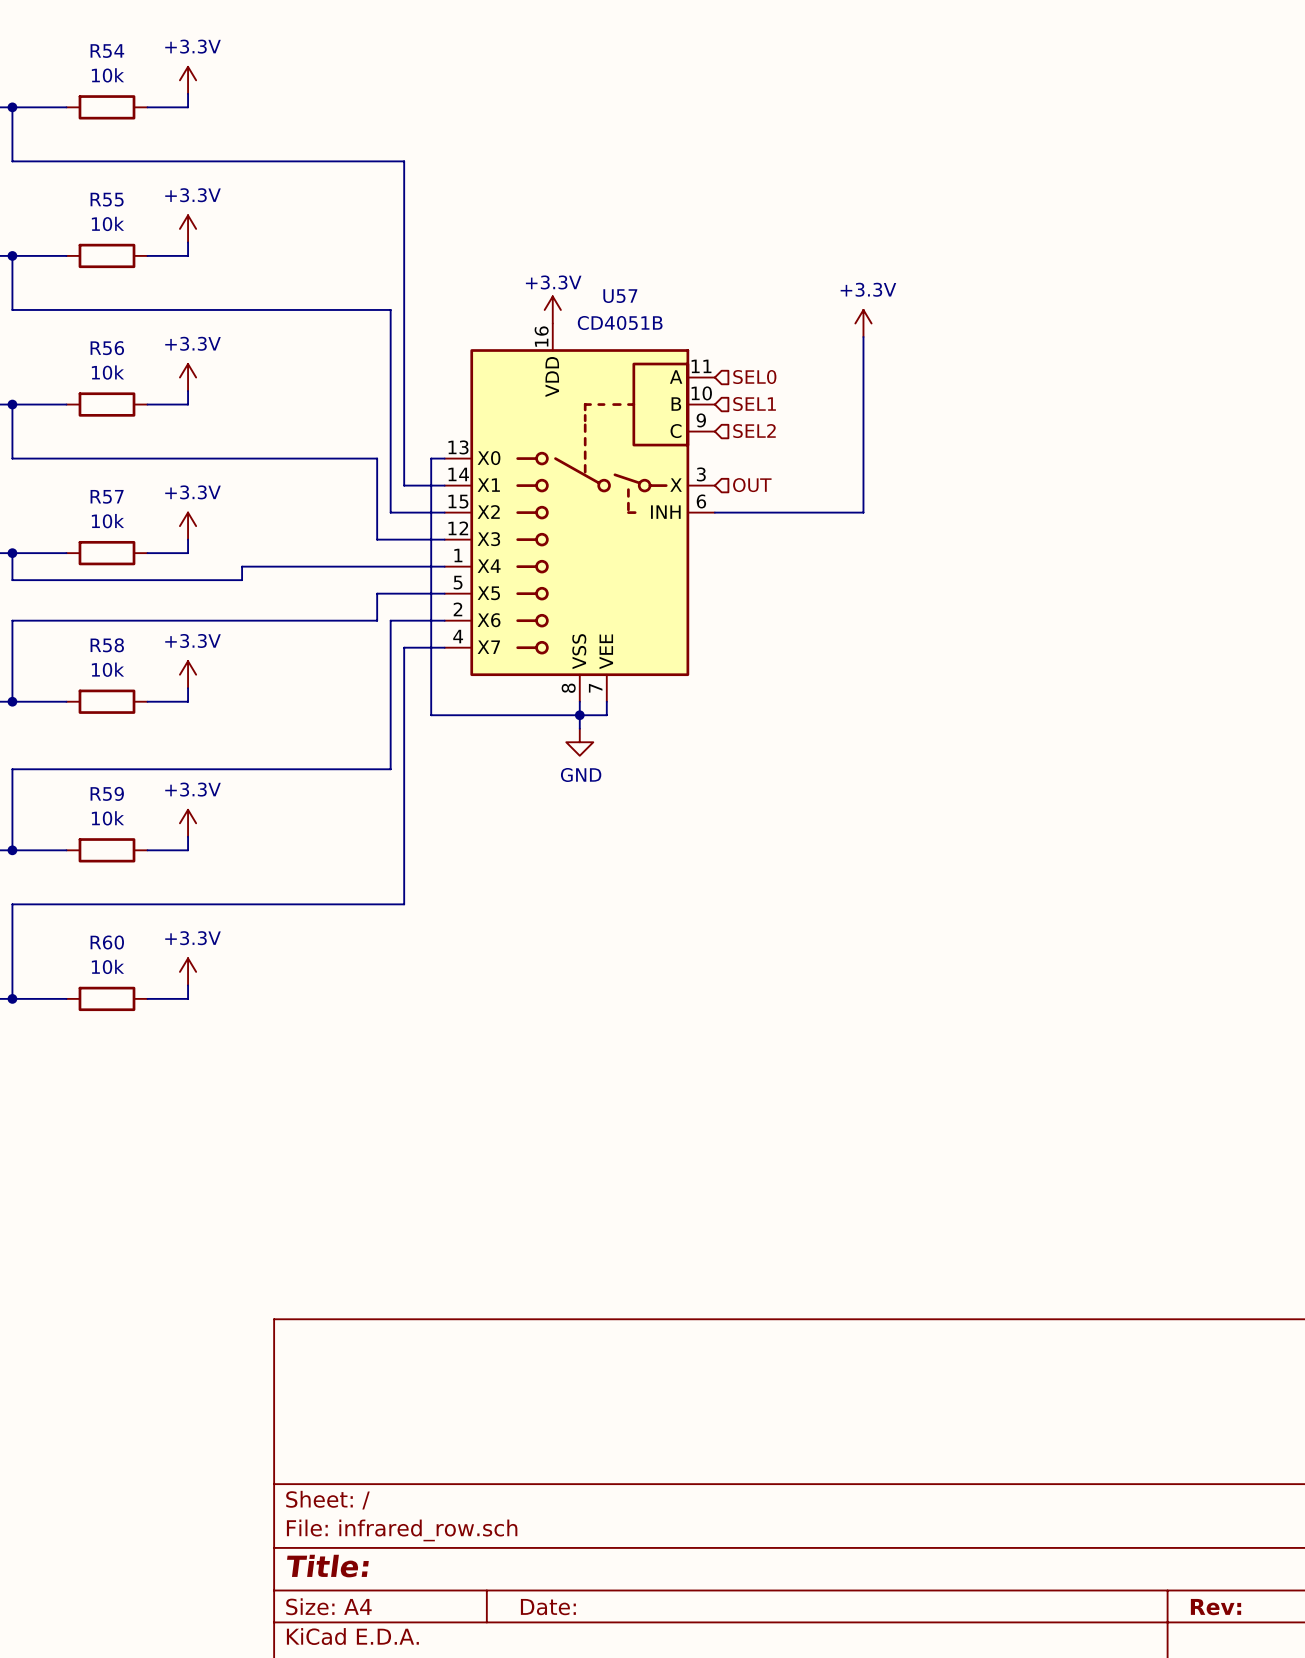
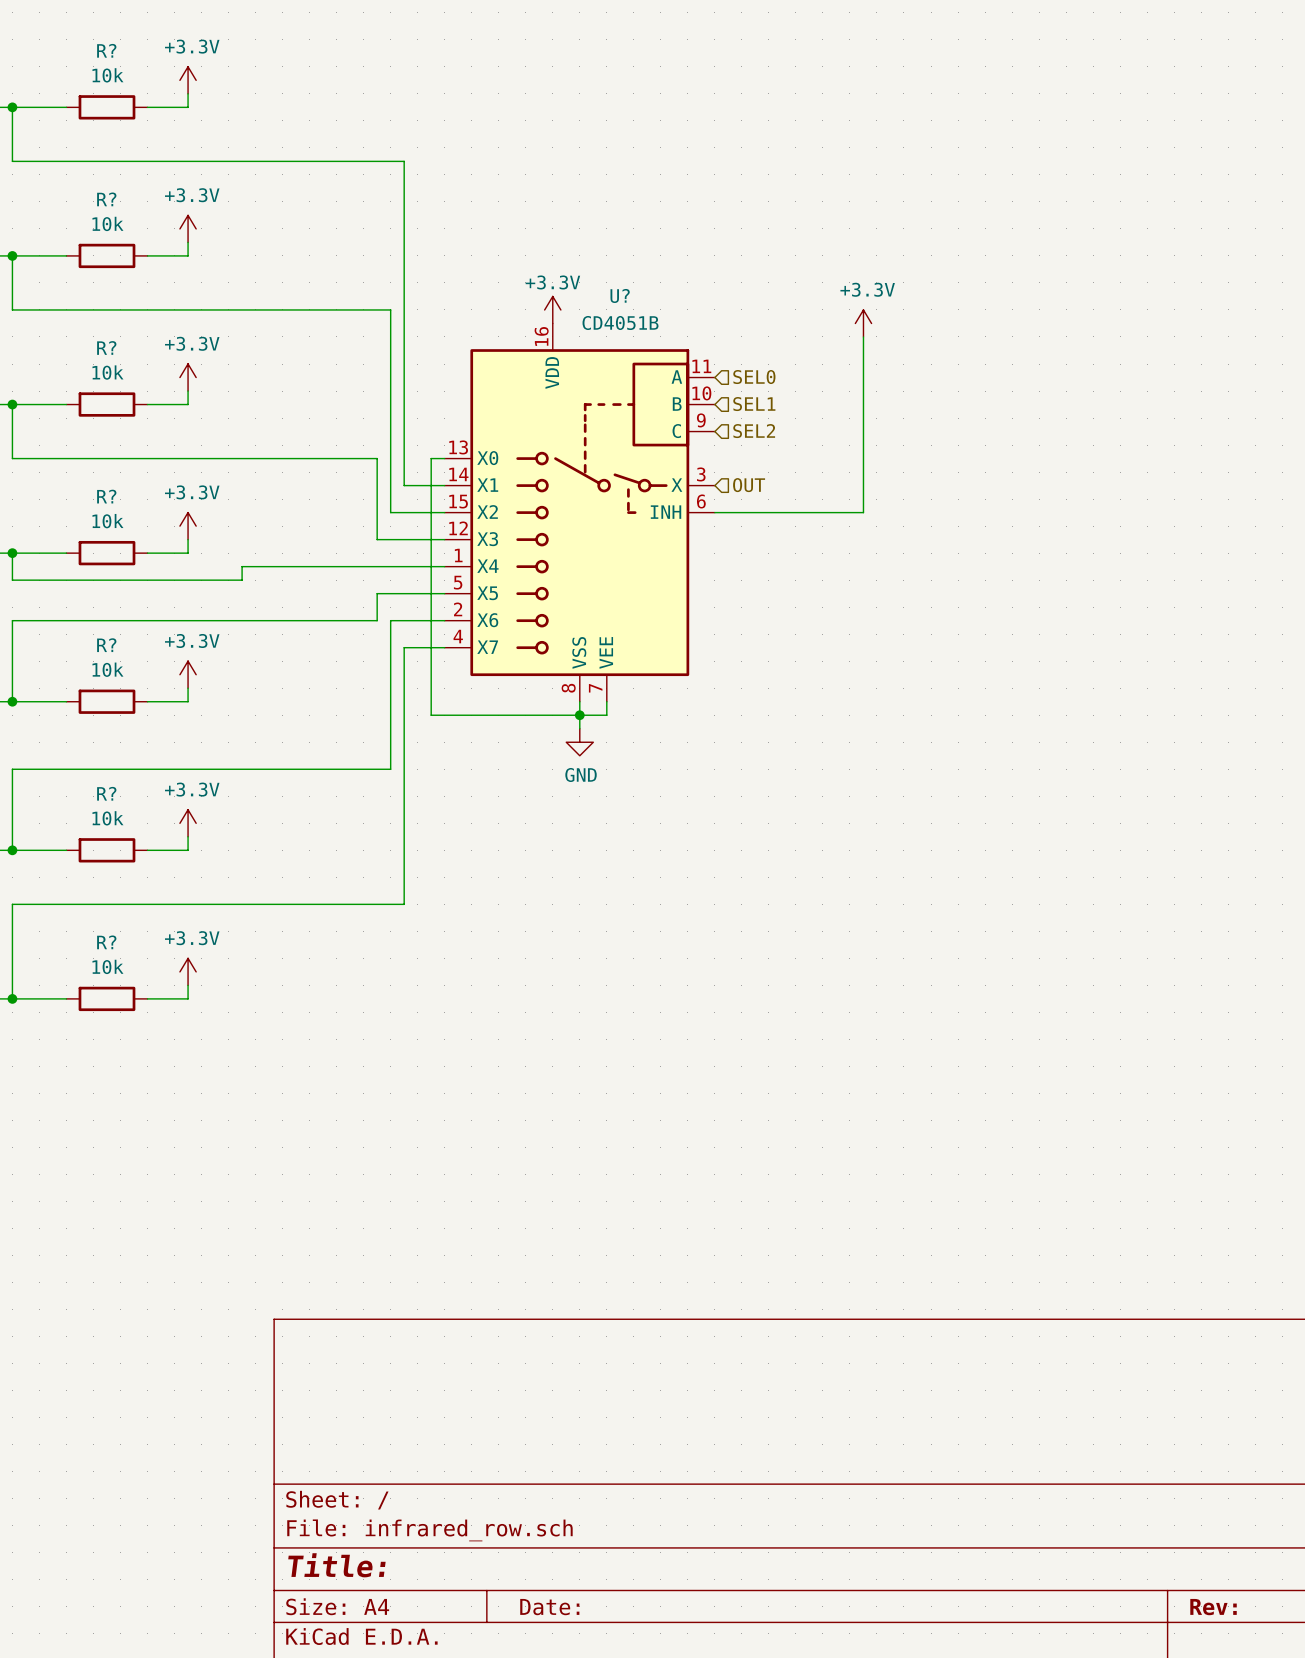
R54 name: R54 (107, 51) -> R? (106, 50)
R55 name: R55 (107, 199) -> R? (106, 199)
U57 name: U57 (620, 296) -> U? (620, 295)
R56 name: R56 (107, 348) -> R? (106, 347)
R57 name: R57 (107, 496) -> R? (106, 496)
R58 name: R58 (107, 645) -> R? (106, 645)
R59 name: R59 (107, 793) -> R? (106, 793)
R60 name: R60 (107, 942) -> R? (106, 942)

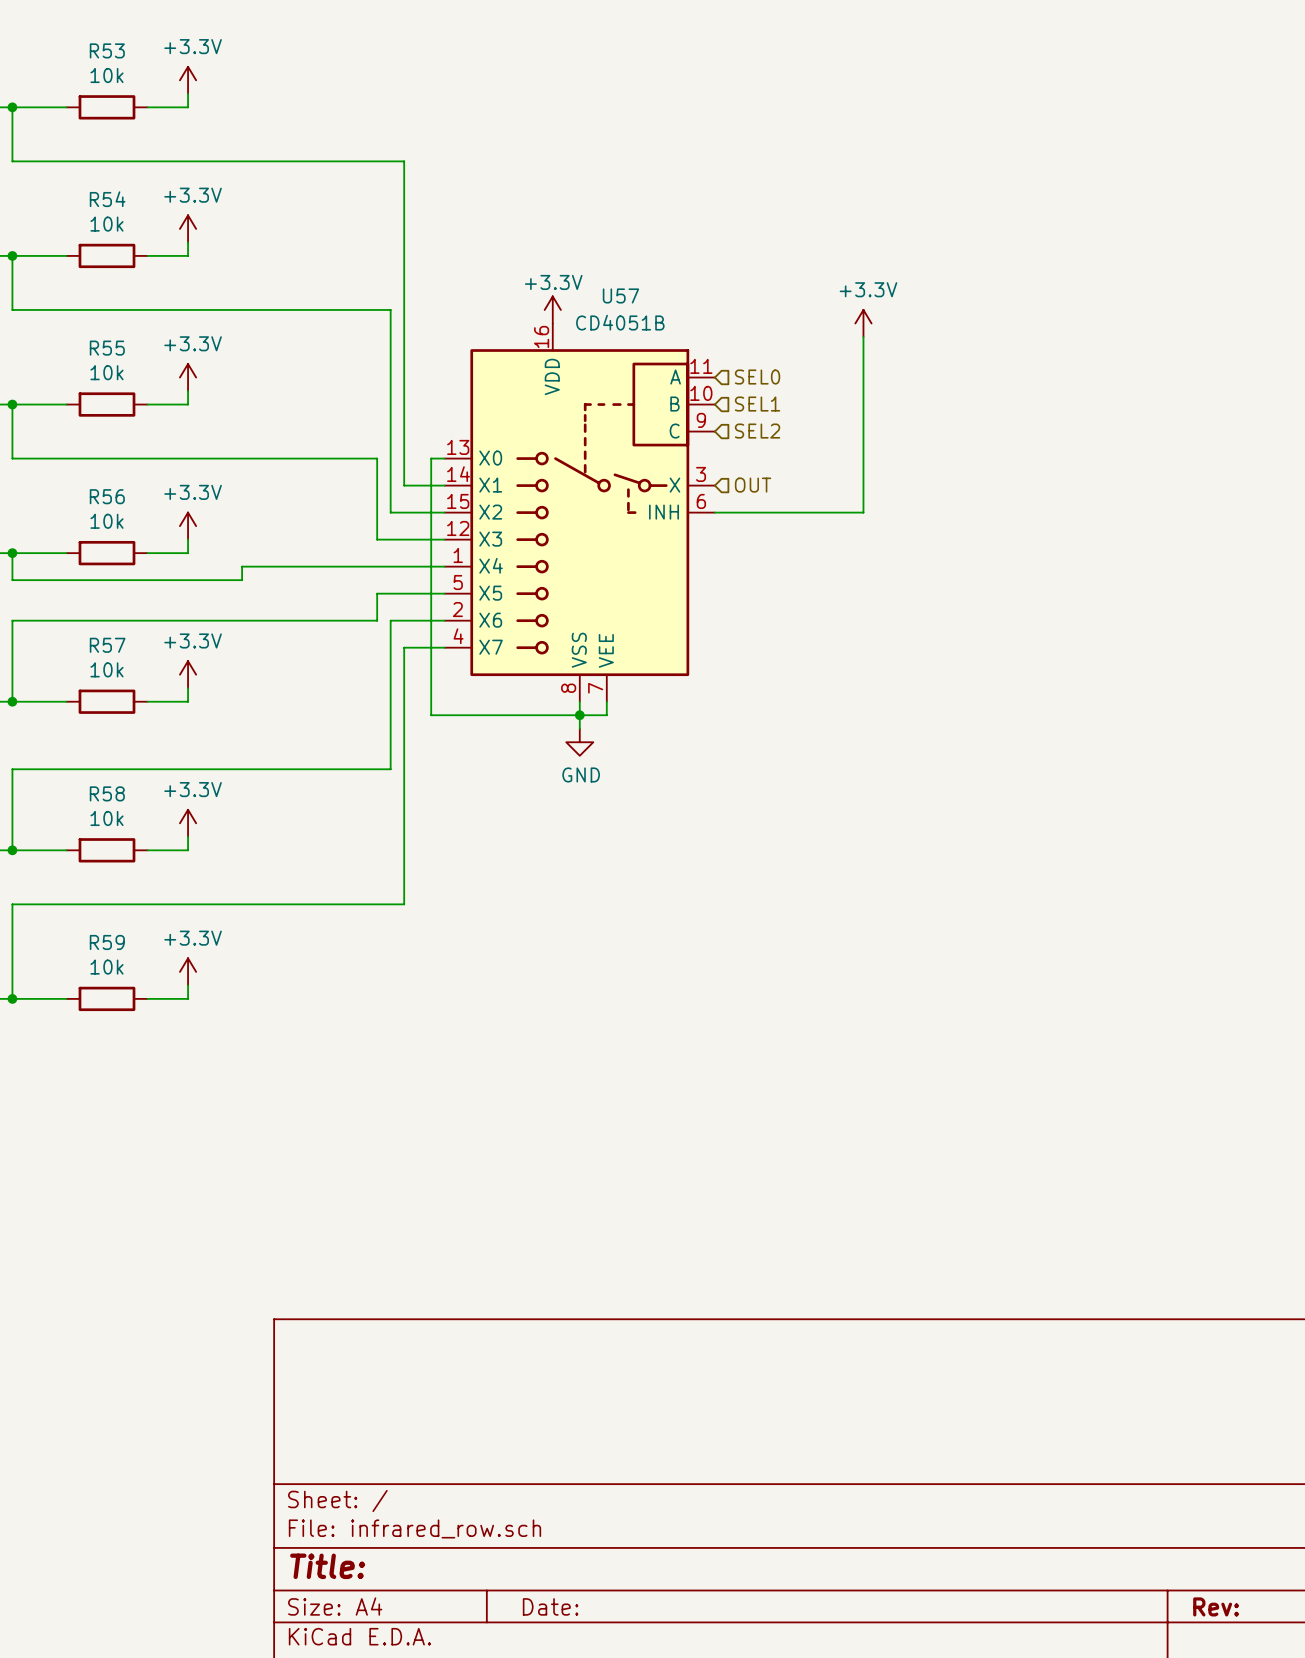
R? name: R? (106, 50) -> R53 (107, 50)
R? name: R? (106, 199) -> R54 (107, 199)
U? name: U? (620, 295) -> U57 (620, 295)
R? name: R? (106, 347) -> R55 (107, 348)
R? name: R? (106, 496) -> R56 (107, 496)
R? name: R? (106, 645) -> R57 (107, 645)
R? name: R? (106, 793) -> R58 (107, 793)
R? name: R? (106, 942) -> R59 (107, 942)

